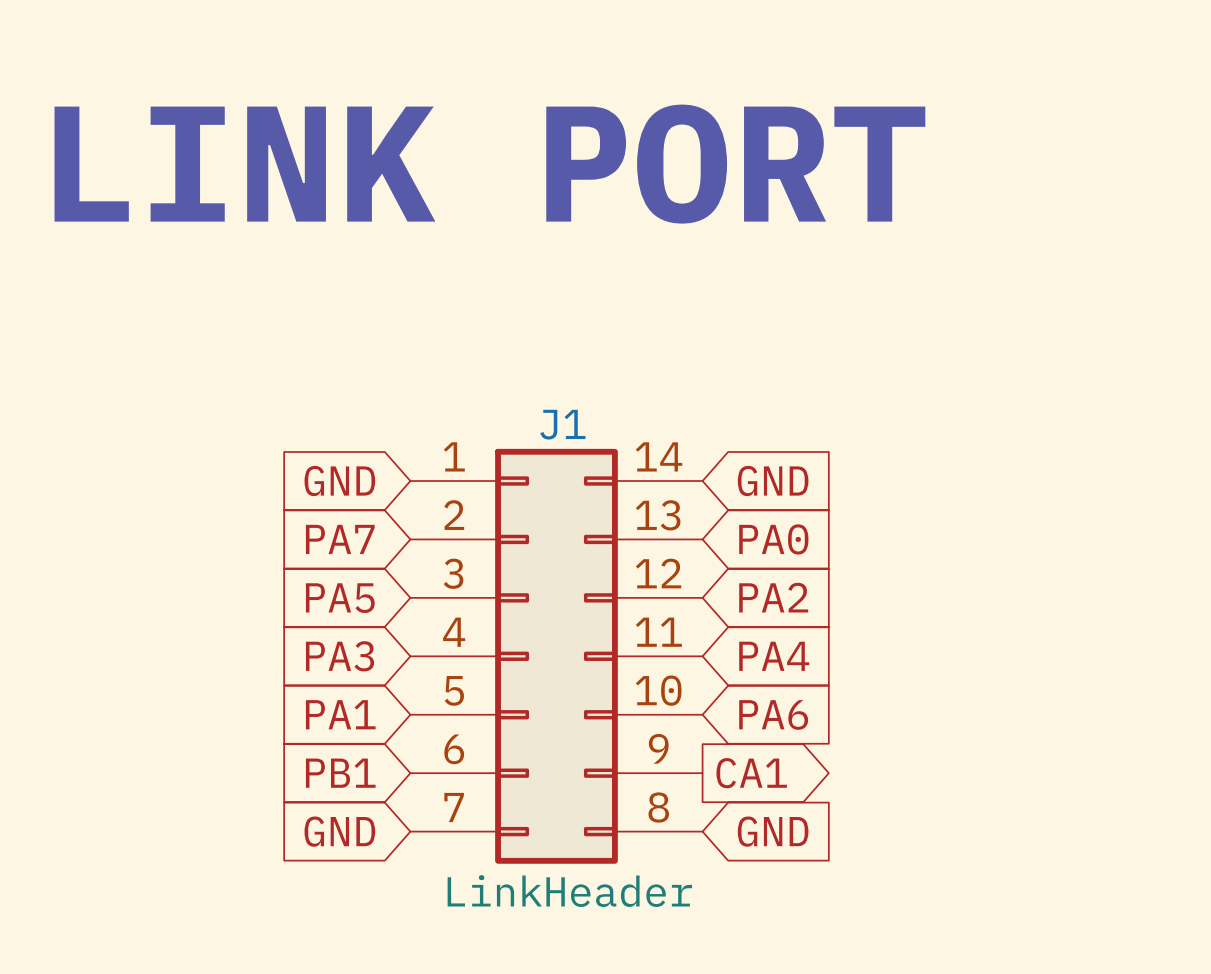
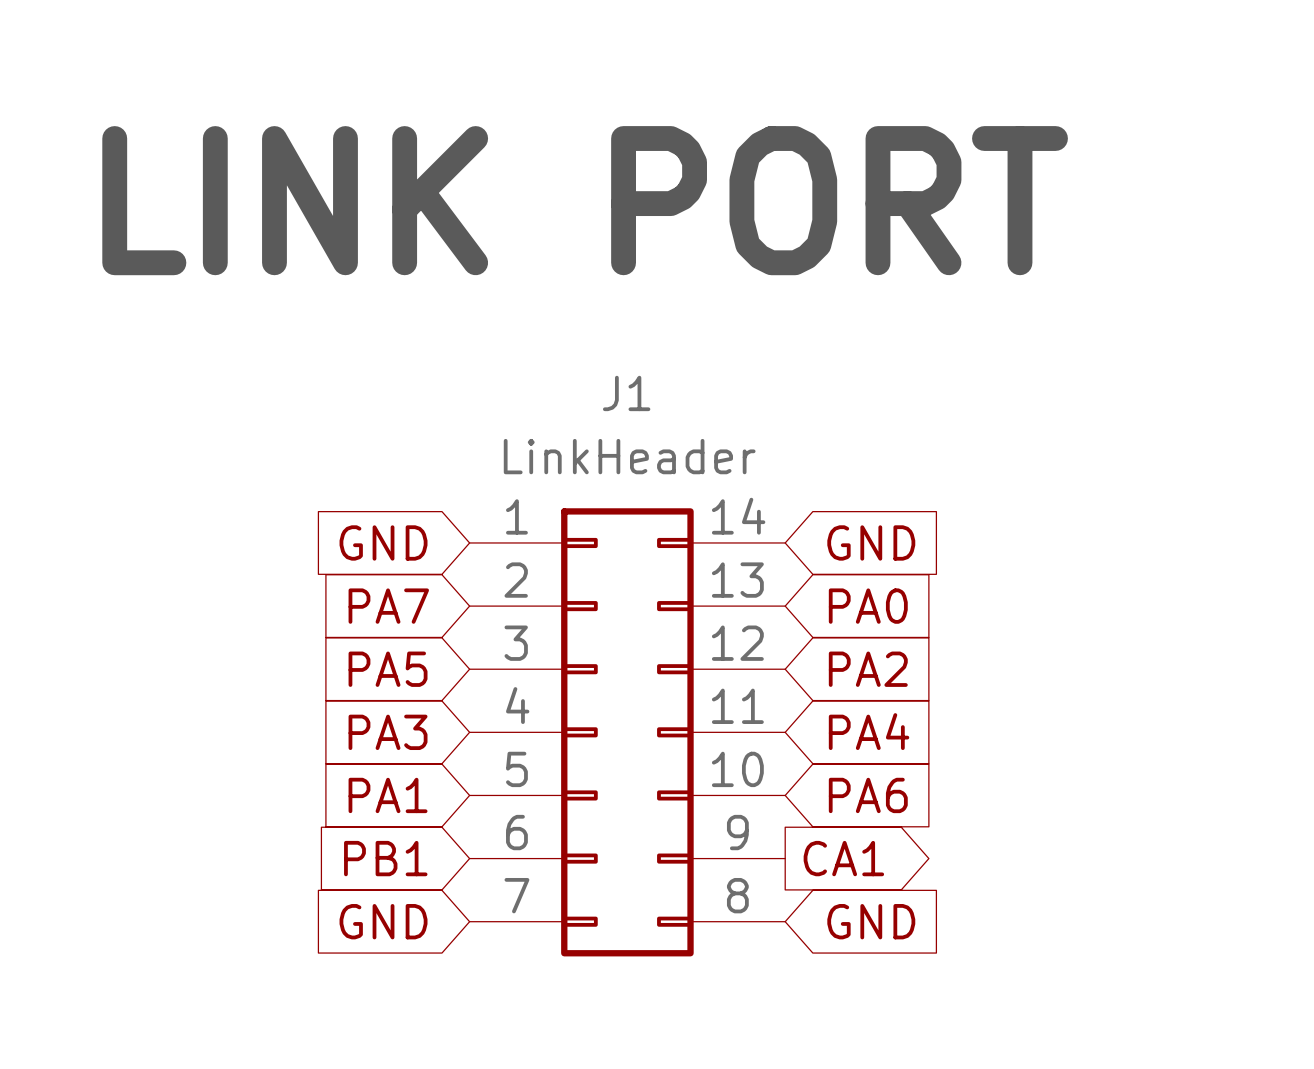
J1 name position: J1 (562, 424) -> J1 (626, 393)
J1 value position: LinkHeader (569, 891) -> LinkHeader (629, 456)

